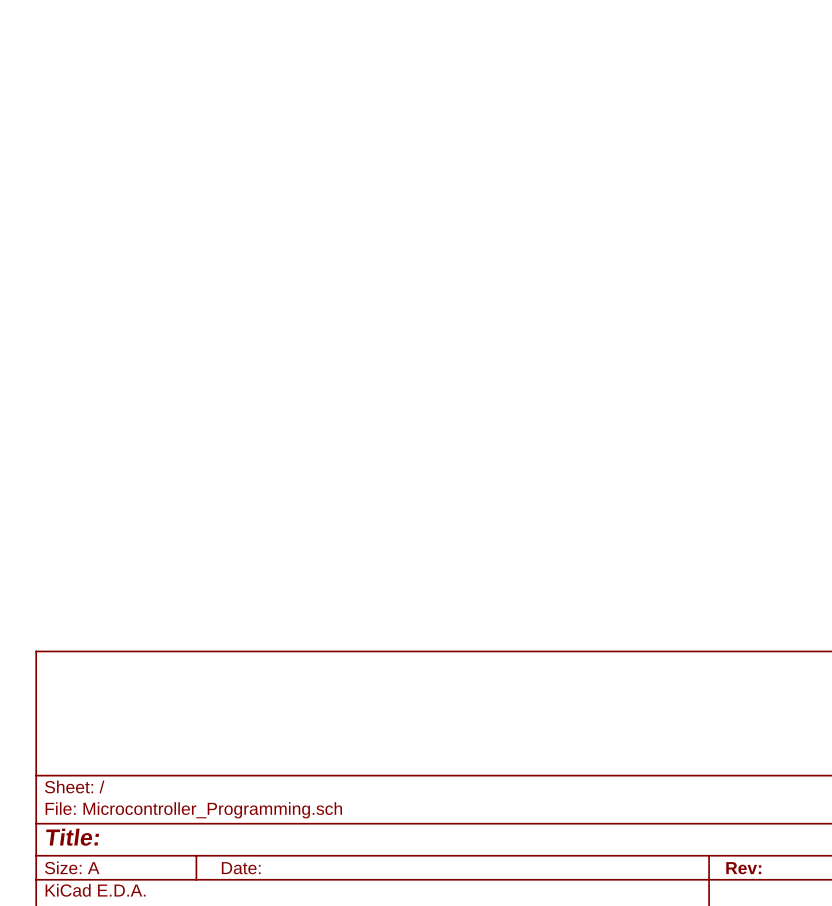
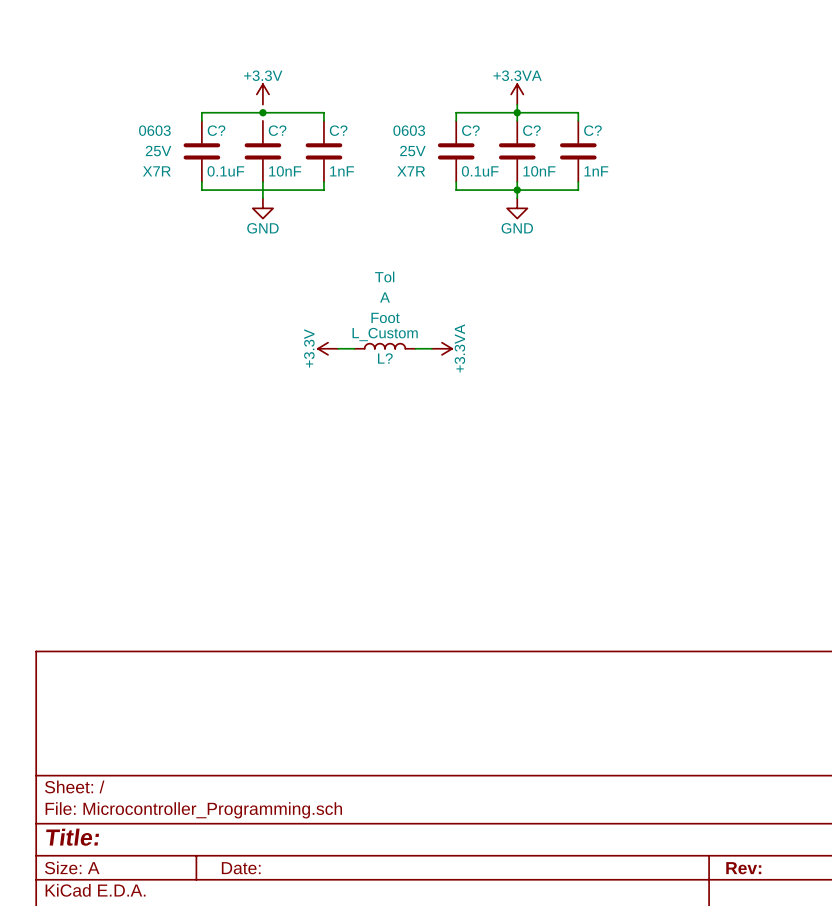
power symbol: none -> +3.3V (262, 94)
power symbol: none -> +3.3VA (517, 94)
wire: none -> (517, 104) (517, 120)
junction: none -> (262, 112)
junction: none -> (517, 112)
wire: none -> (201, 120) (201, 112) (323, 112) (323, 120)
wire: none -> (456, 120) (456, 112) (578, 112) (578, 120)
C?: none -> 0.1uF (201, 151)
C?: none -> 10nF (262, 151)
C?: none -> 1nF (323, 151)
C?: none -> 0.1uF (456, 151)
C?: none -> 10nF (517, 151)
C?: none -> 1nF (578, 151)
wire: none -> (201, 181) (201, 190) (323, 190) (323, 181)
wire: none -> (262, 181) (262, 198)
wire: none -> (456, 181) (456, 190) (578, 190) (578, 181)
wire: none -> (517, 181) (517, 198)
junction: none -> (517, 190)
power symbol: none -> GND (262, 208)
power symbol: none -> GND (517, 208)
L?: none -> L_Custom (385, 346)
power symbol: none -> +3.3V (328, 348)
wire: none -> (338, 348) (354, 348)
wire: none -> (415, 348) (431, 348)
power symbol: none -> +3.3VA (441, 348)

